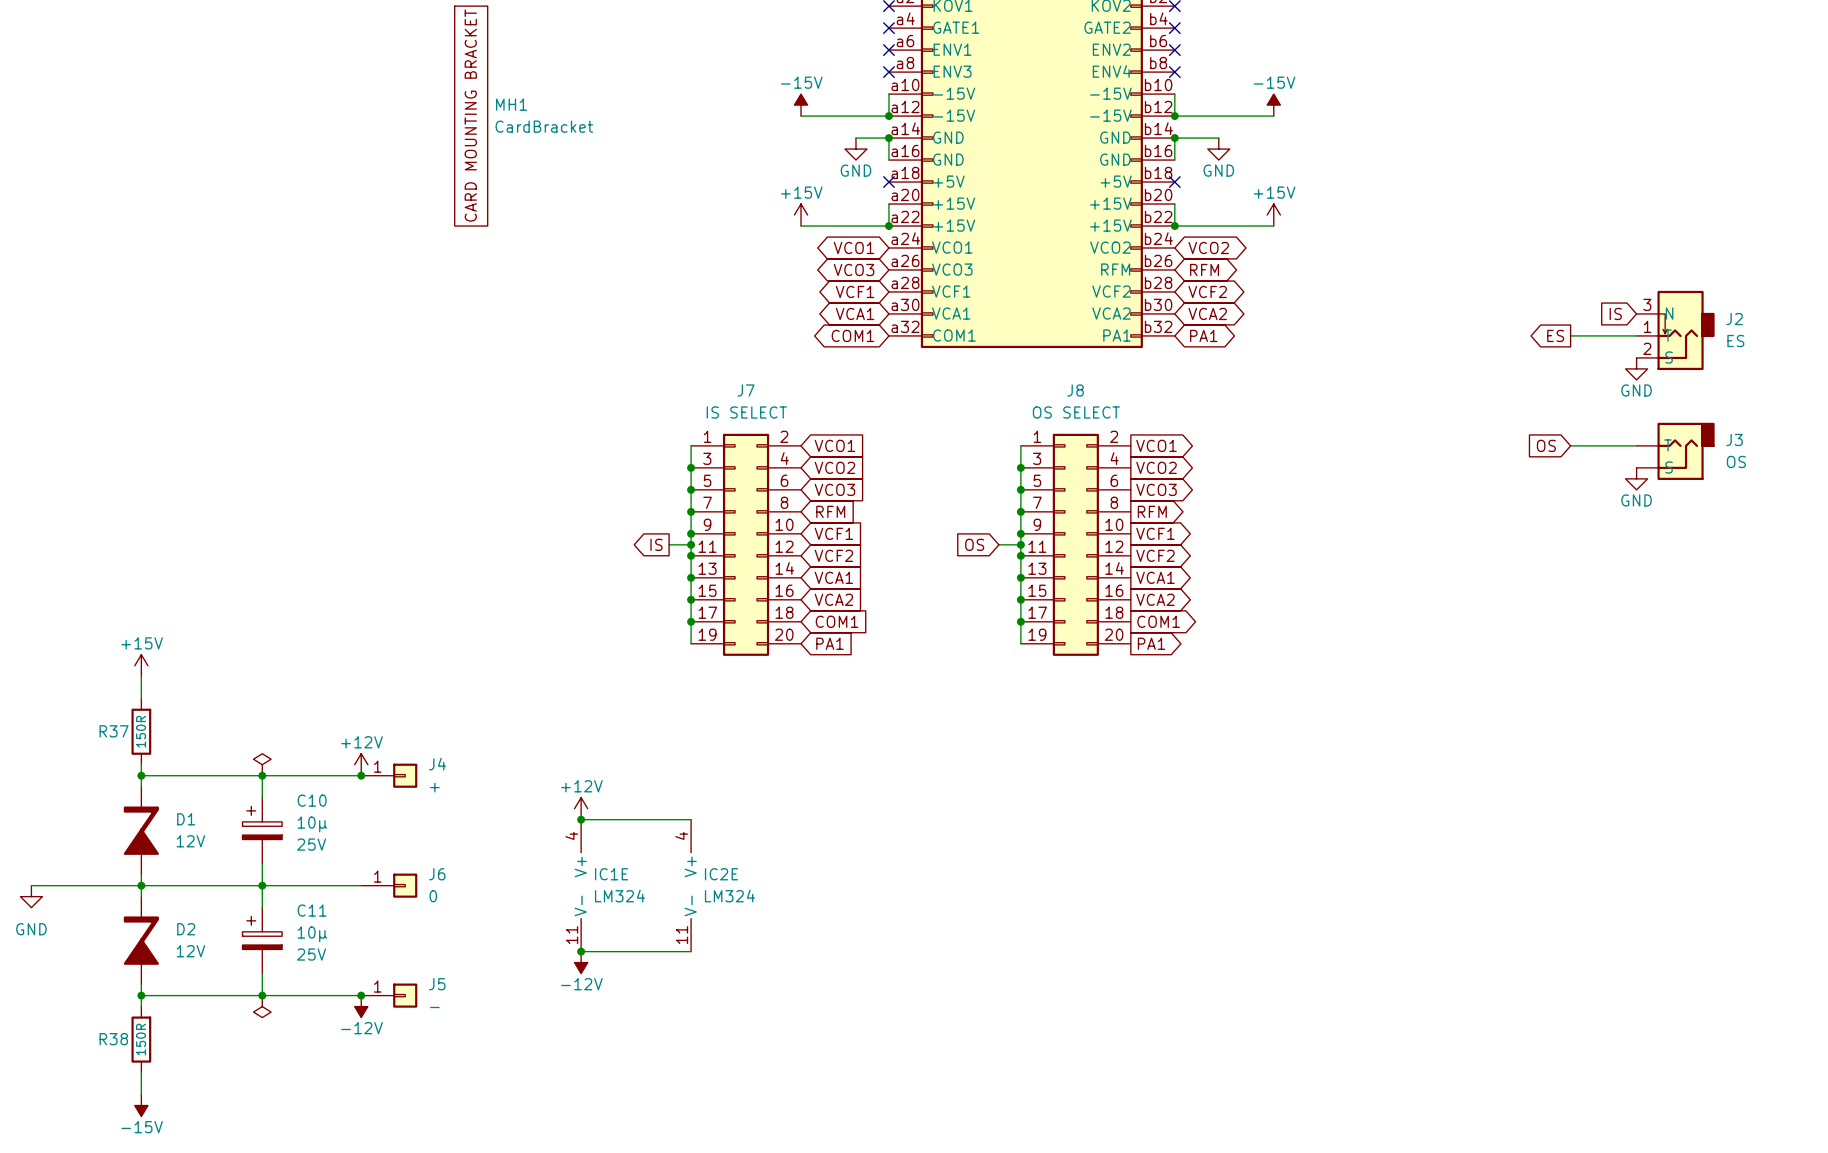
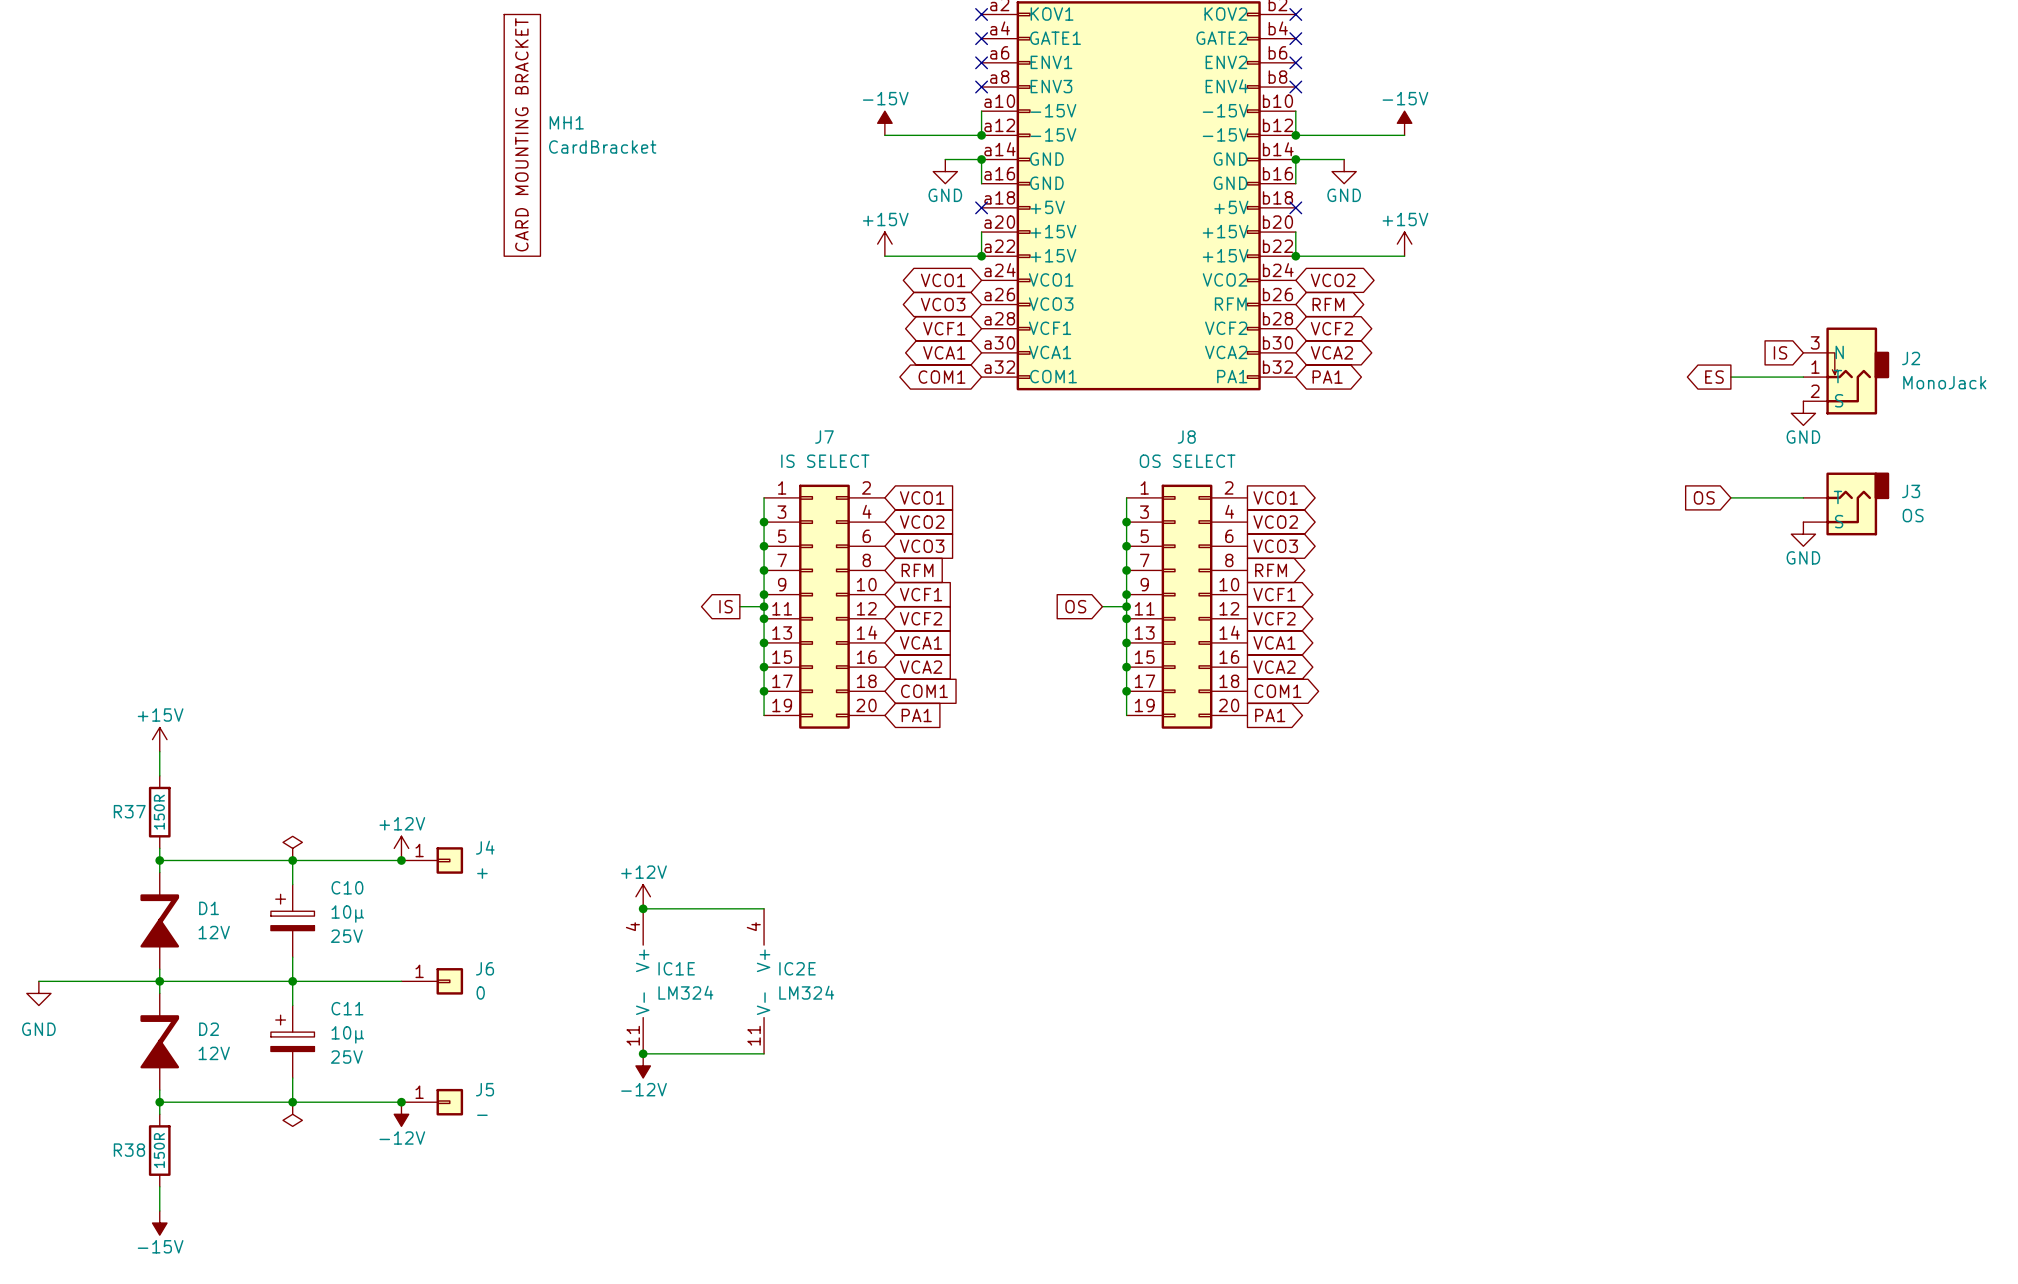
J2 value: ES (1735, 341) -> MonoJack (1944, 382)

